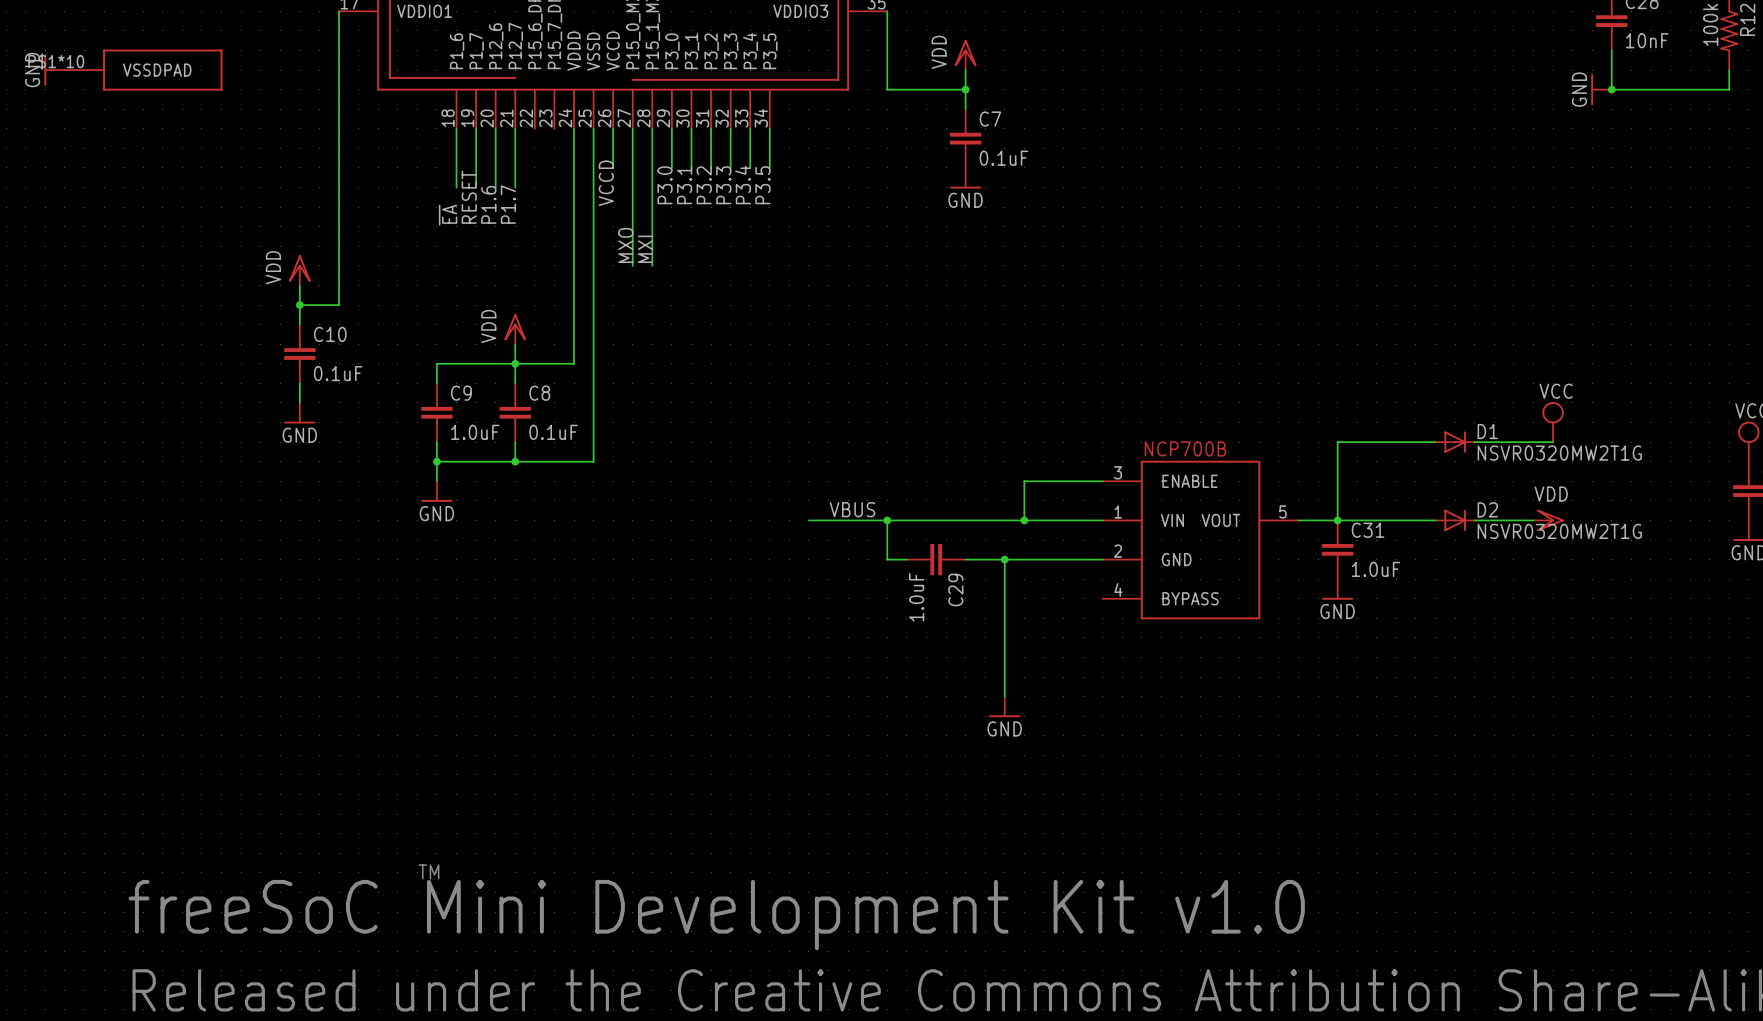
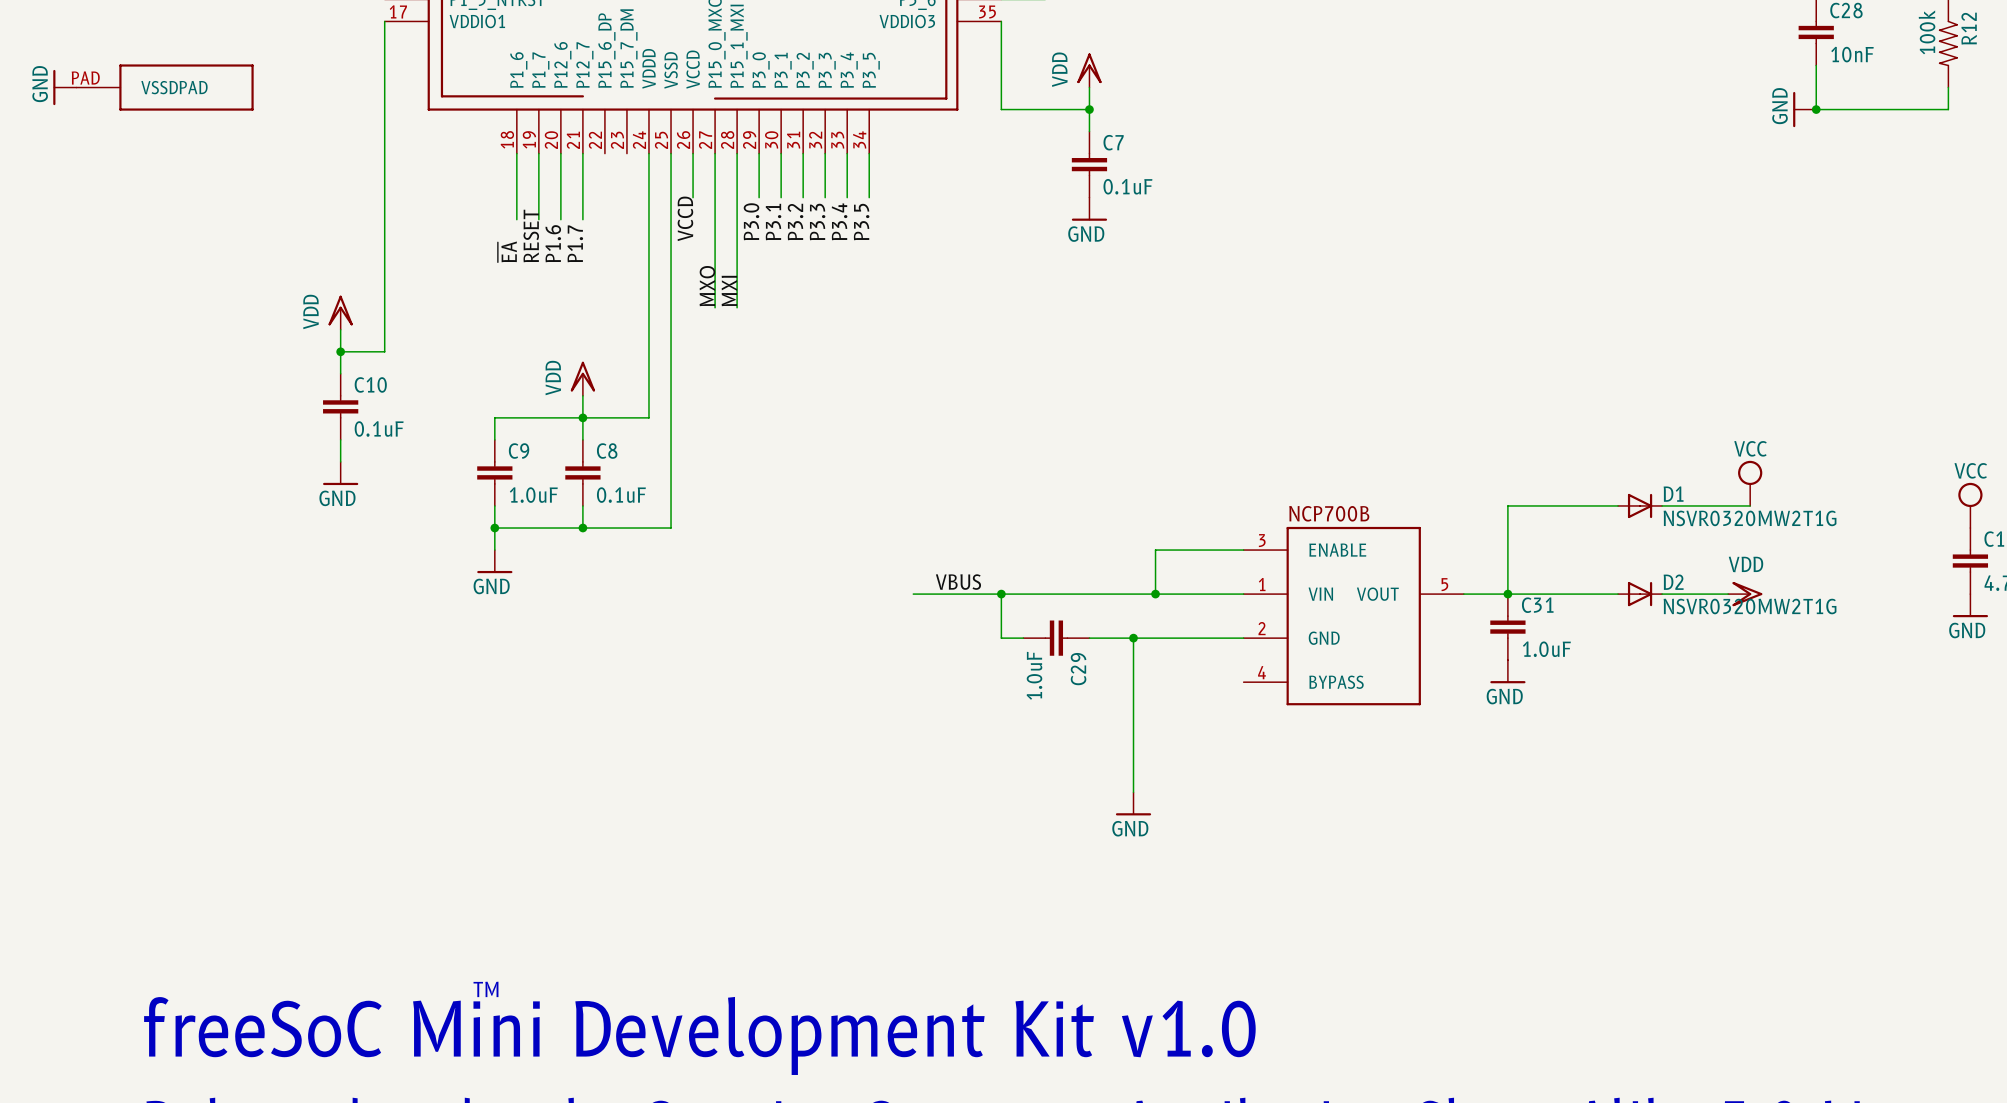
part pin number: P$1*10 (56, 61) -> PAD (85, 77)

